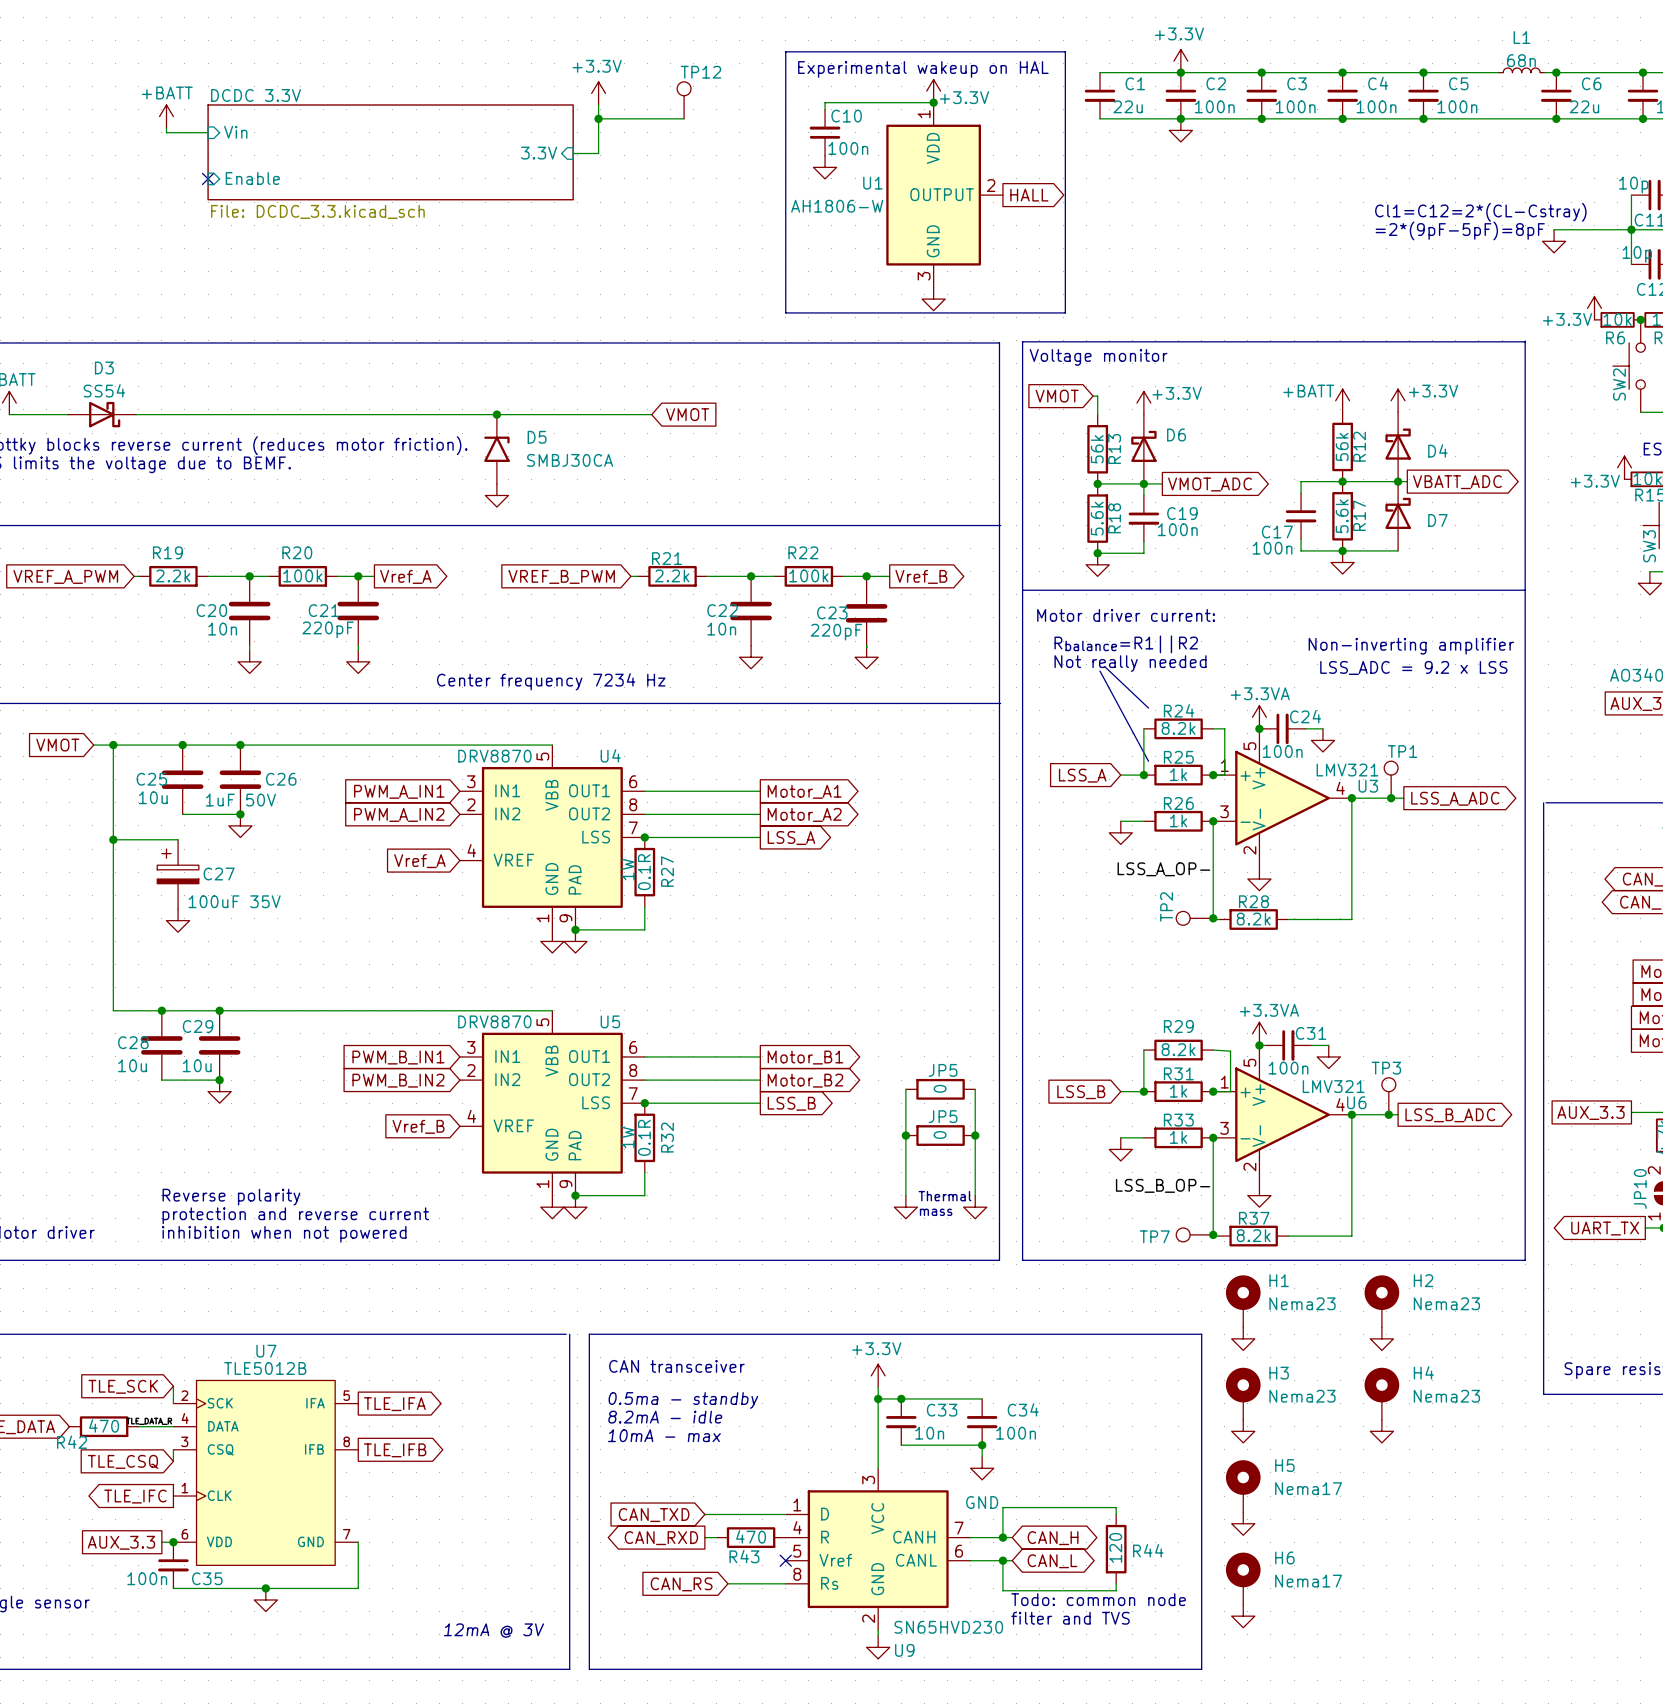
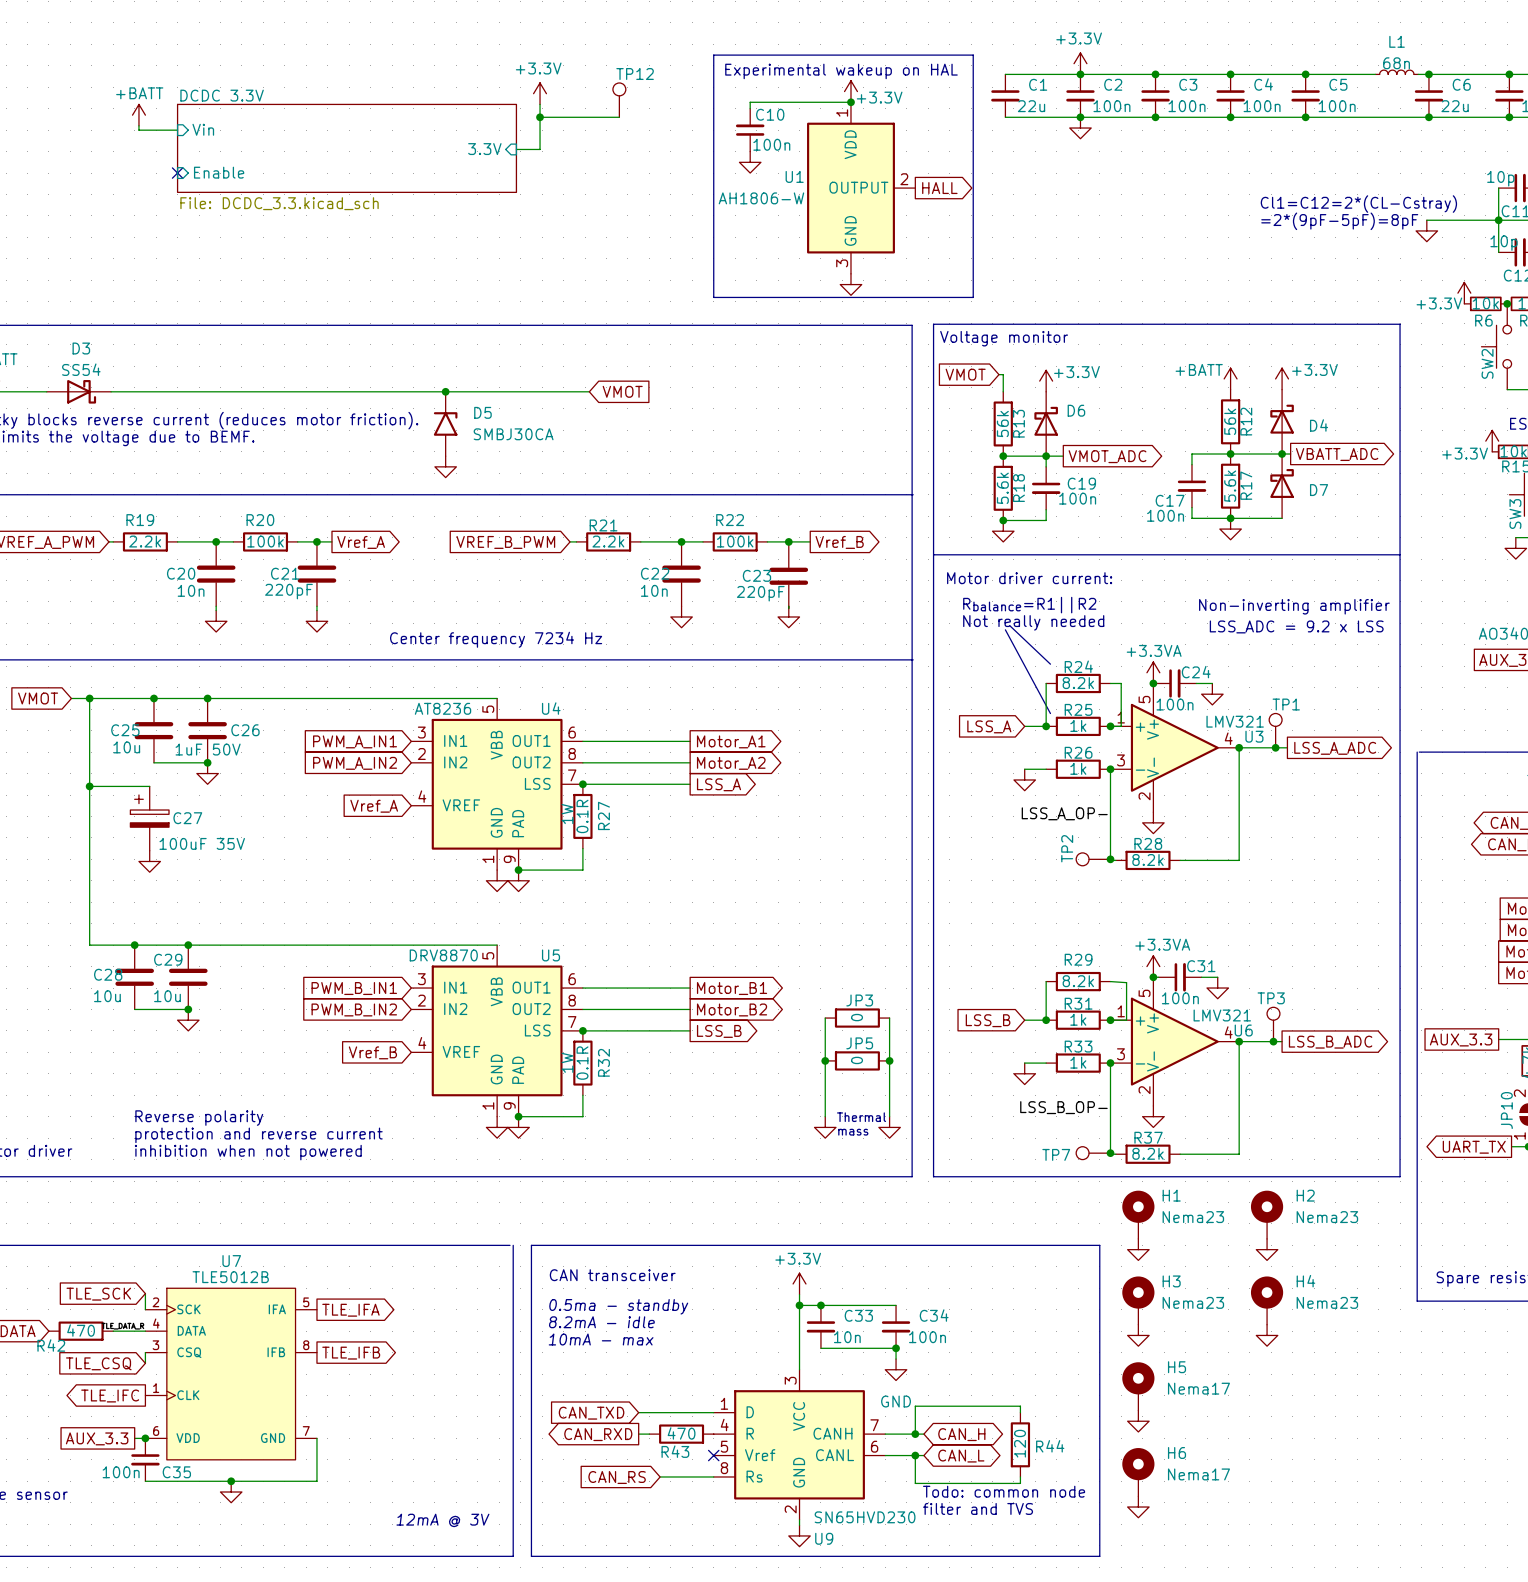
U4 value: DRV8870 (494, 756) -> AT8236 (443, 708)
JP5 name: JP5 (943, 1070) -> JP3 (859, 1000)

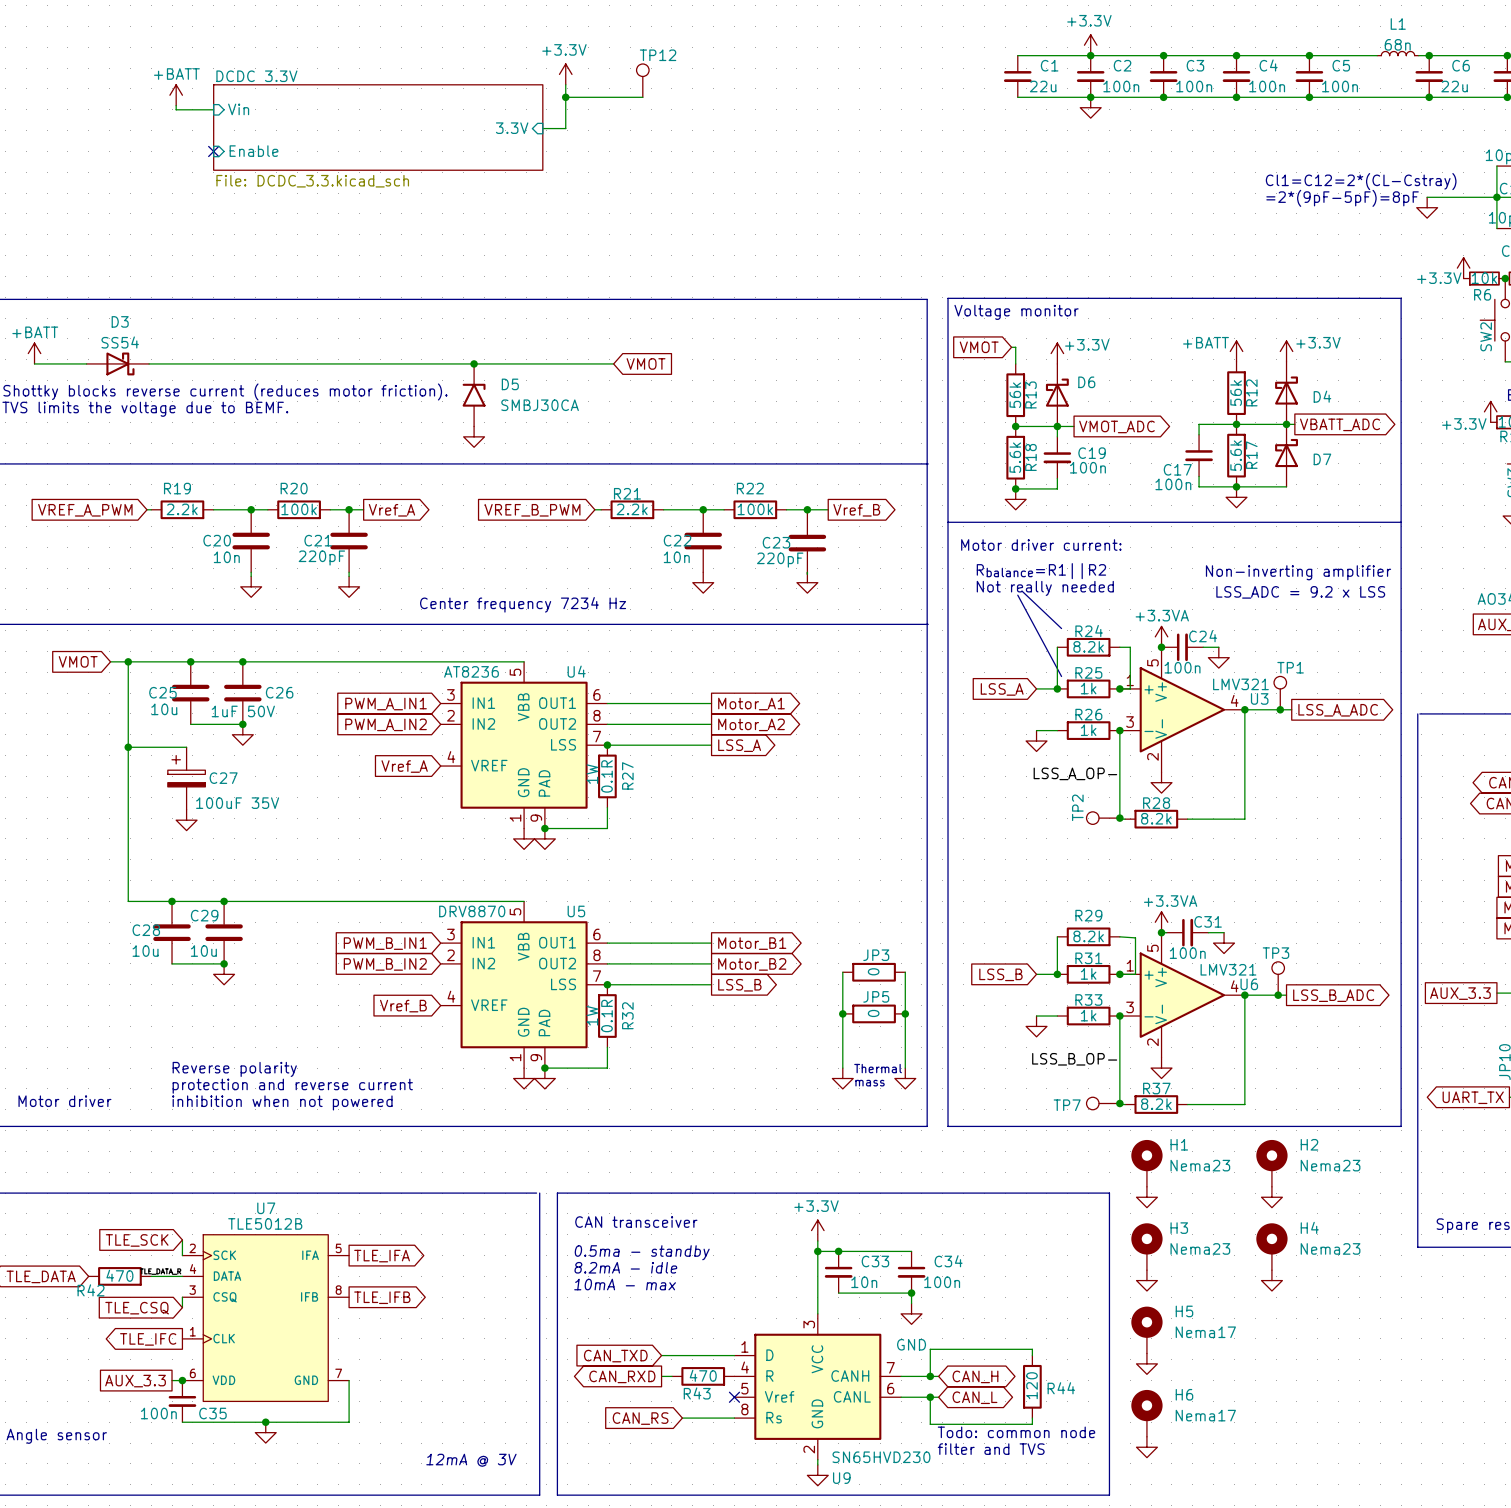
line: (713, 55) (973, 55) (973, 297) (713, 297) (713, 55) -> none
text: Experimental wakeup on HAL (841, 71) -> none
power symbol: +3.3V (850, 91) -> none
wire: (850, 102) (750, 102) (750, 108) -> none
junction: (850, 102) -> none
C10: 100n (750, 130) -> none
power symbol: (750, 162) -> none
U1: AH1806-W (861, 188) -> none
global label: HALL (939, 188) -> none
power symbol: (850, 284) -> none

